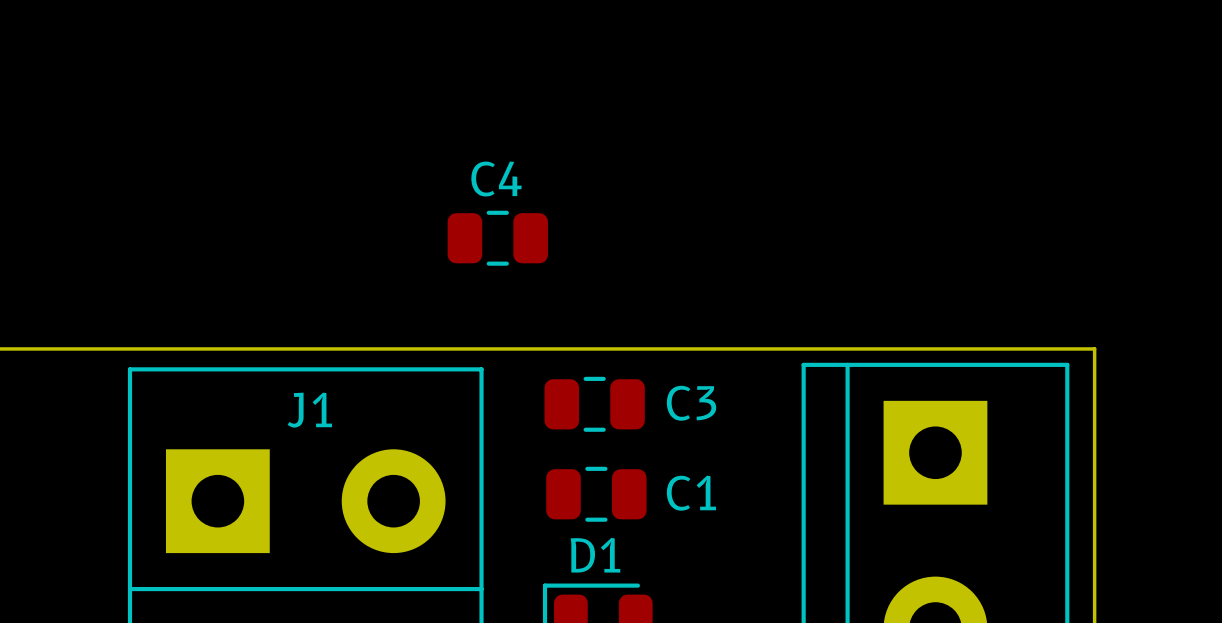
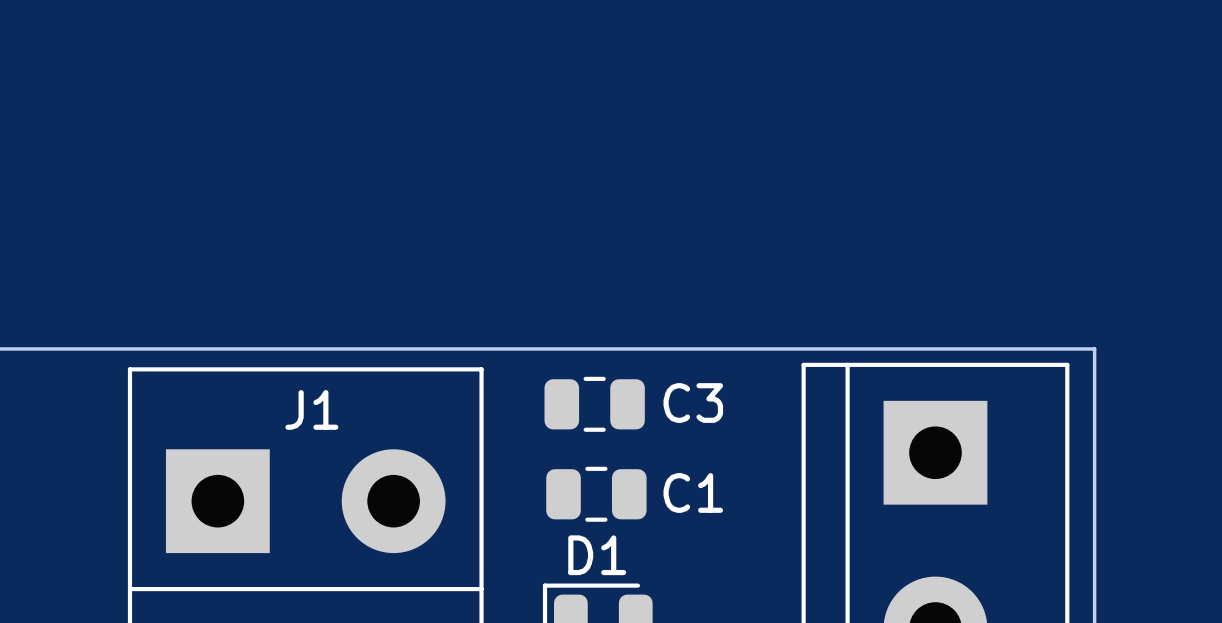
C4: (497, 238) -> none

